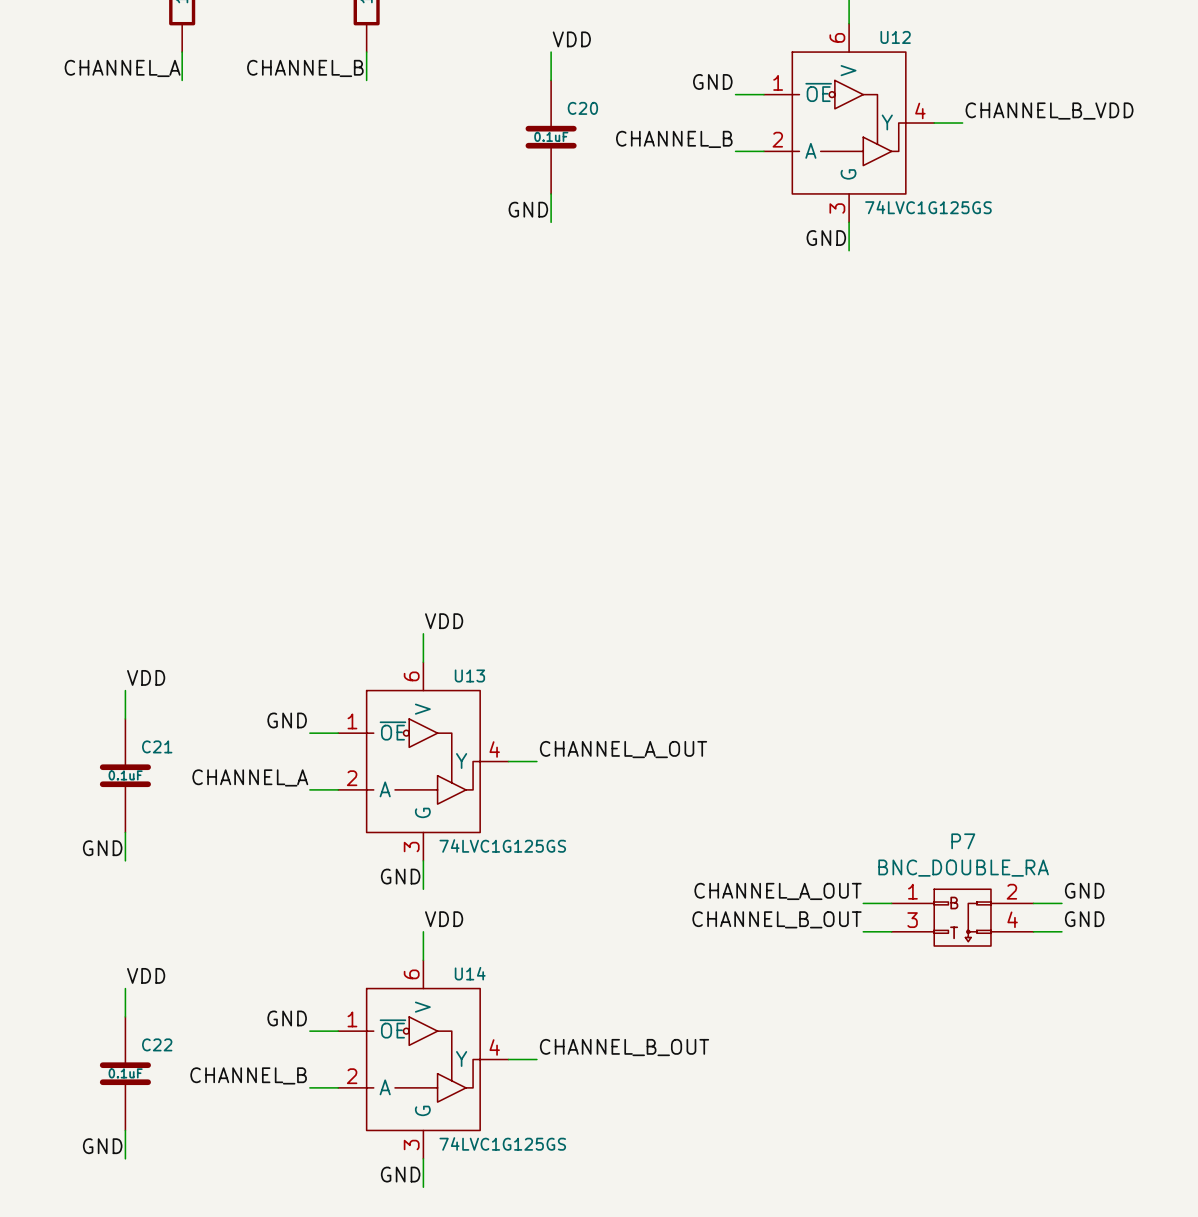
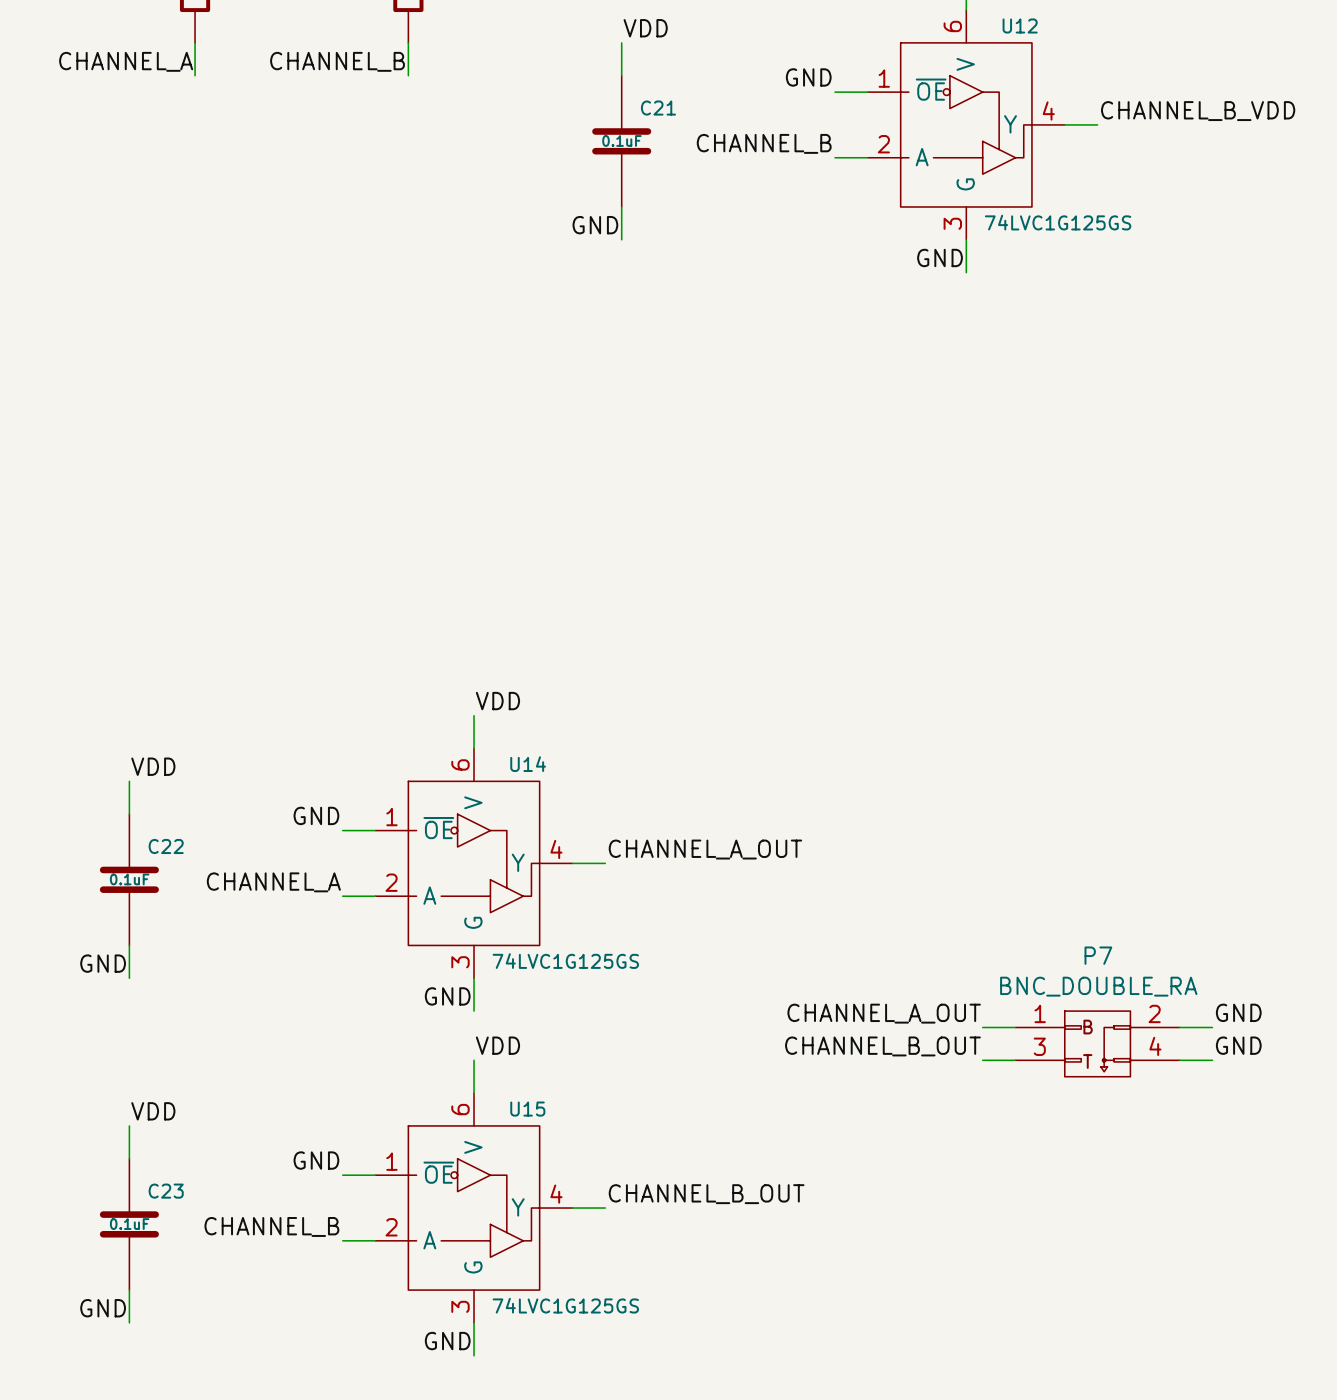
C20 name: C20 (582, 108) -> C21 (658, 108)
U13 name: U13 (469, 675) -> U14 (528, 764)
C21 name: C21 (157, 746) -> C22 (166, 846)
U14 name: U14 (470, 973) -> U15 (527, 1109)
C22 name: C22 (157, 1044) -> C23 (166, 1191)

